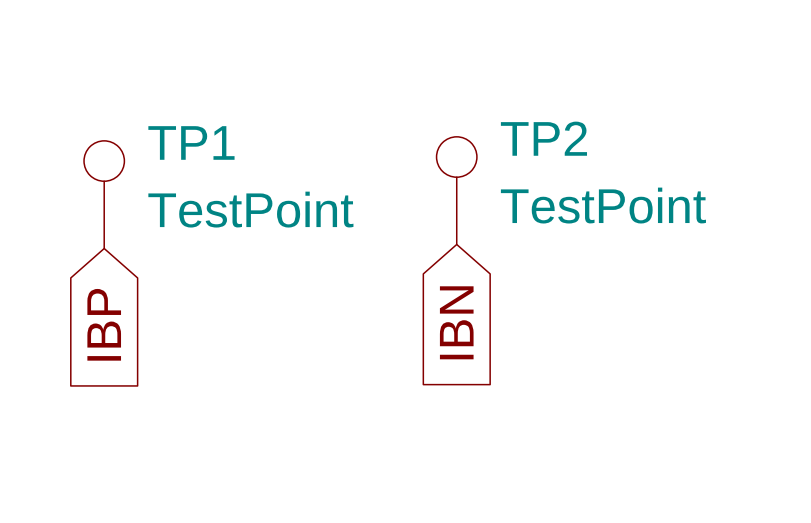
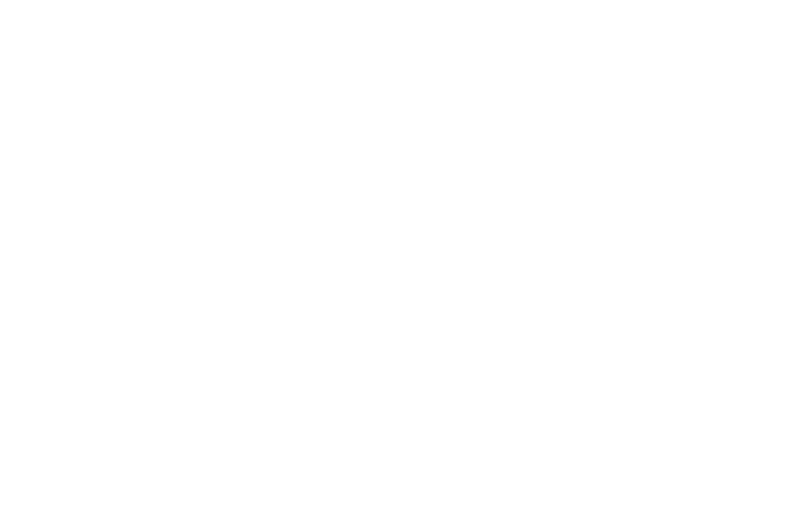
TP2: TestPoint (456, 190) -> none
TP1: TestPoint (104, 194) -> none
global label: IBN (456, 322) -> none
global label: IBP (104, 324) -> none

